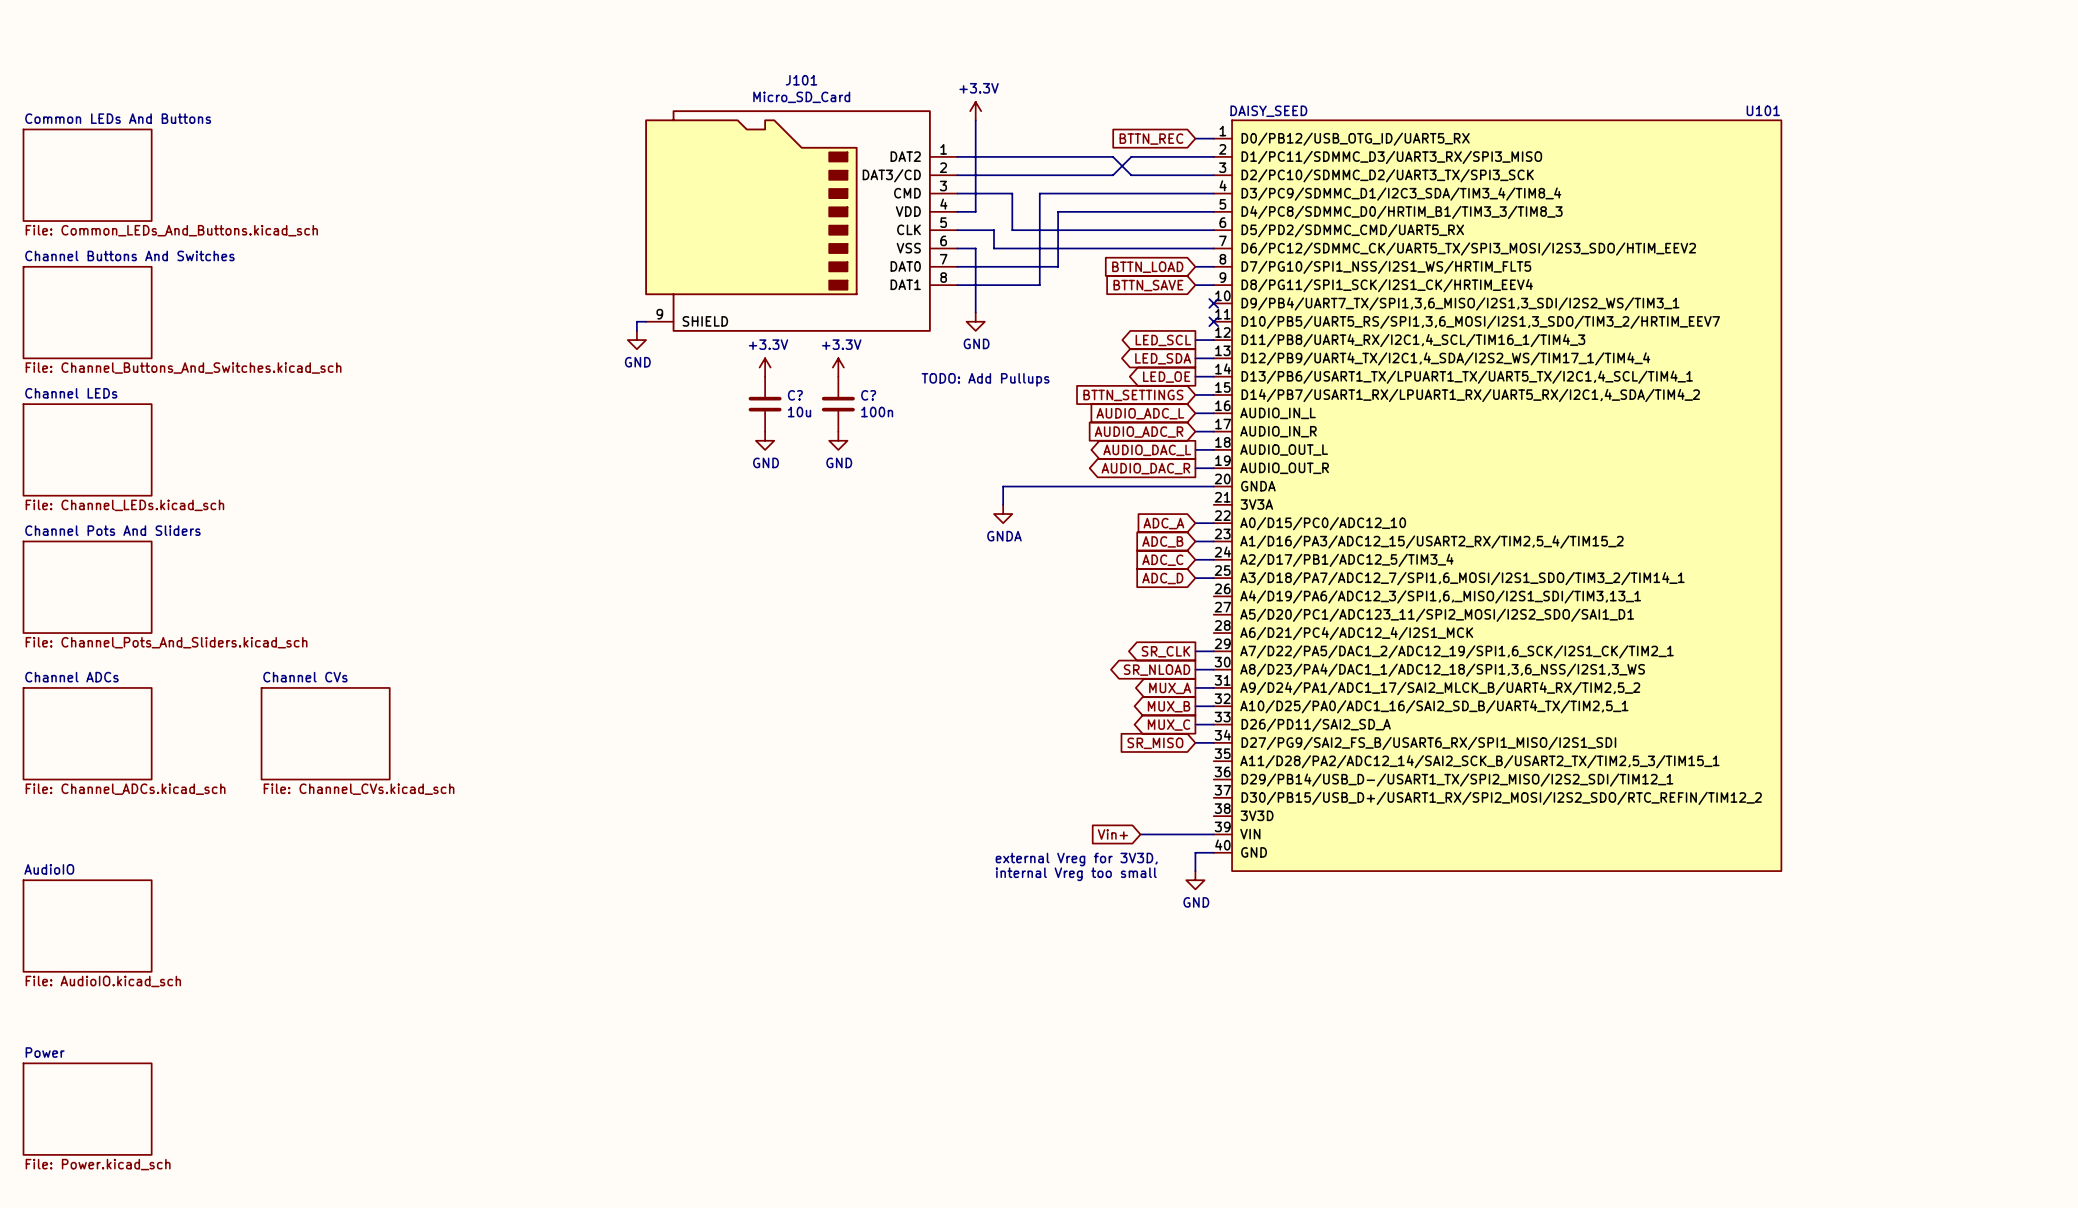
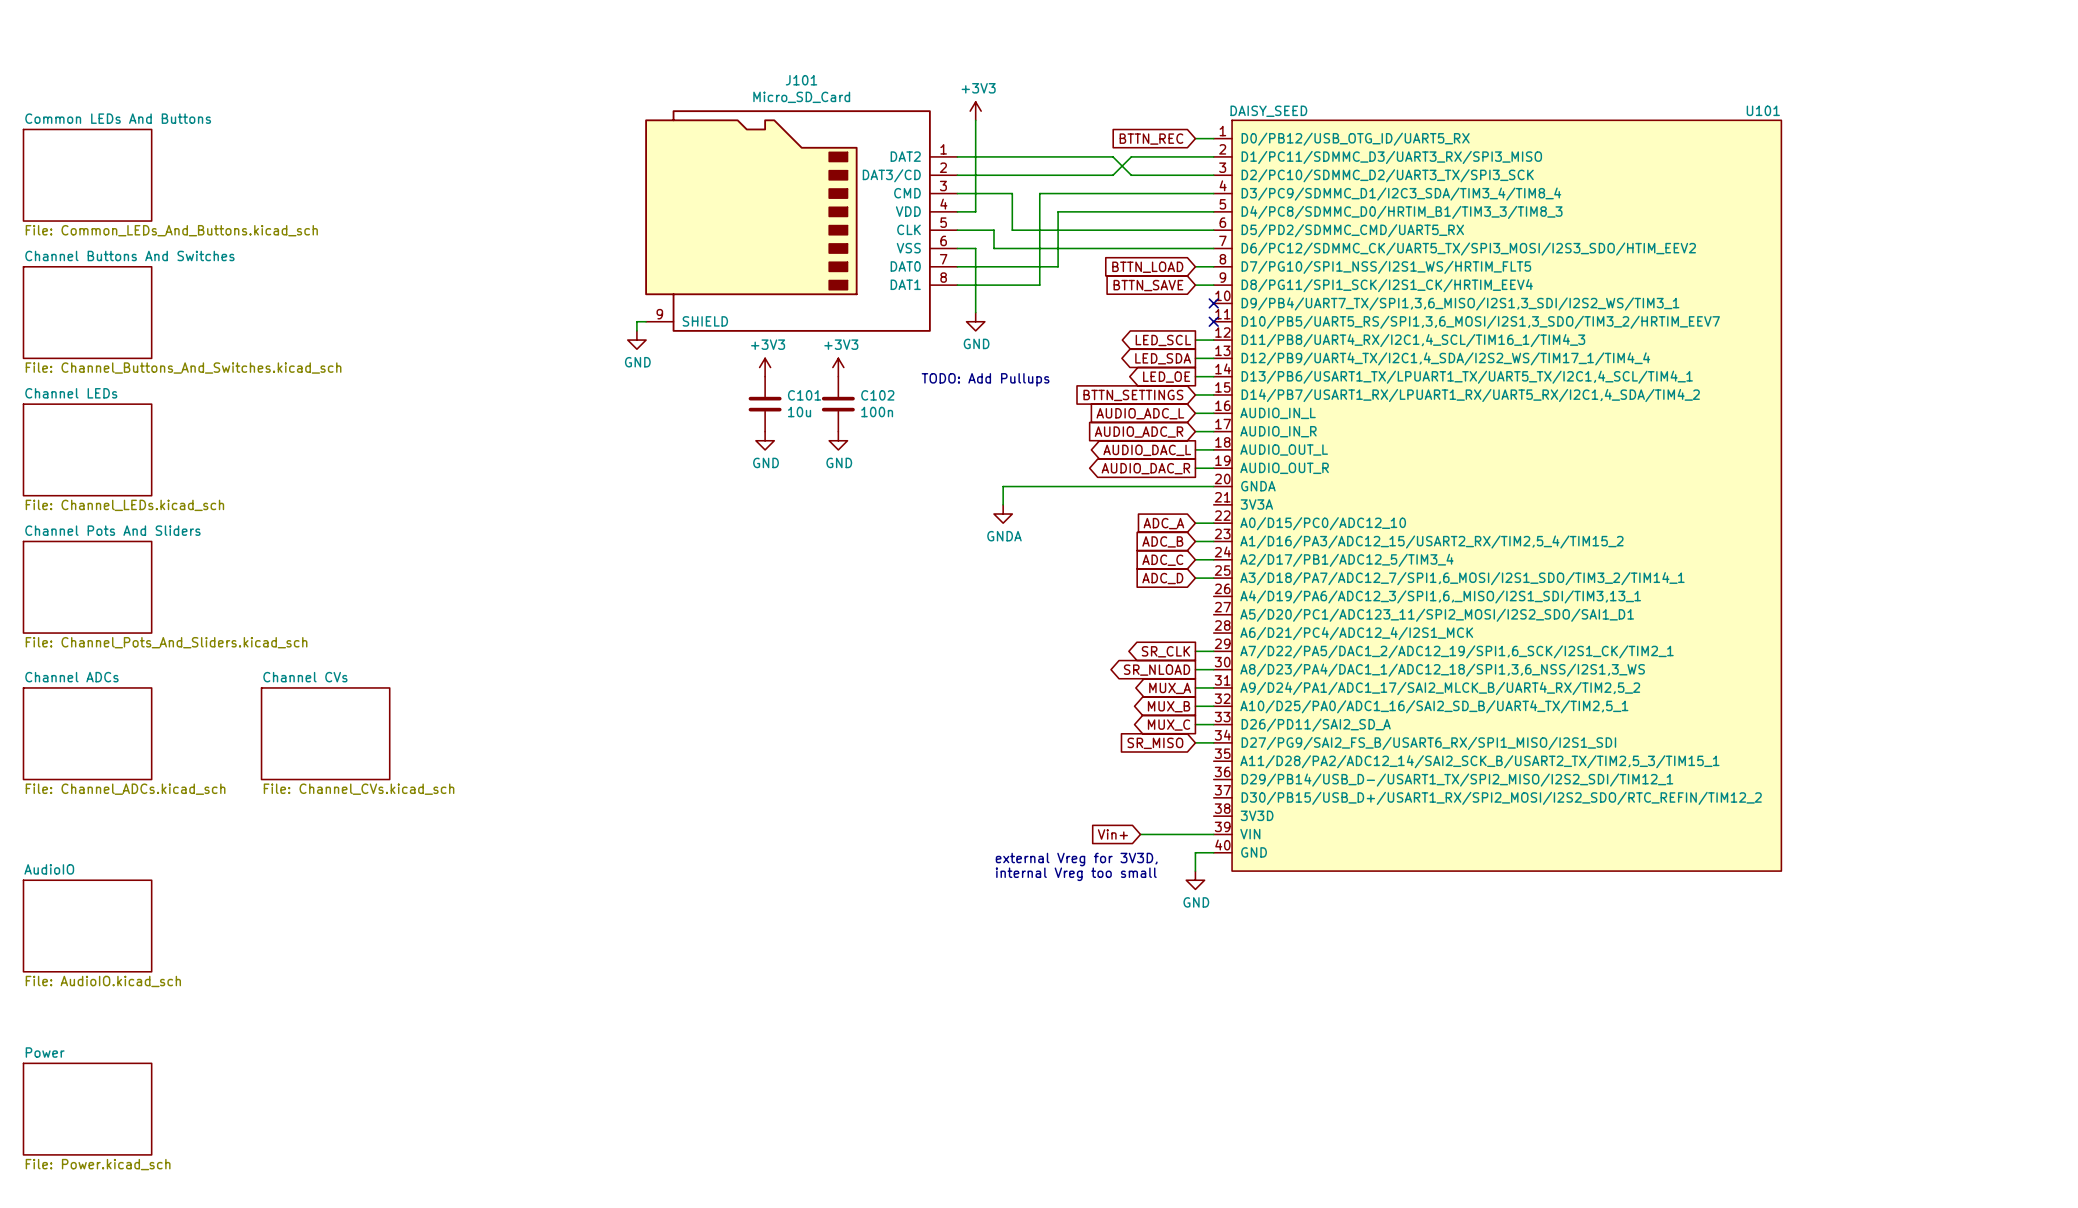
power symbol: +3.3V (975, 111) -> +3V3 (975, 111)
power symbol: +3.3V (765, 367) -> +3V3 (765, 367)
power symbol: +3.3V (838, 367) -> +3V3 (838, 367)
C? name: C? (795, 395) -> C101 (804, 395)
C? name: C? (868, 395) -> C102 (877, 395)

